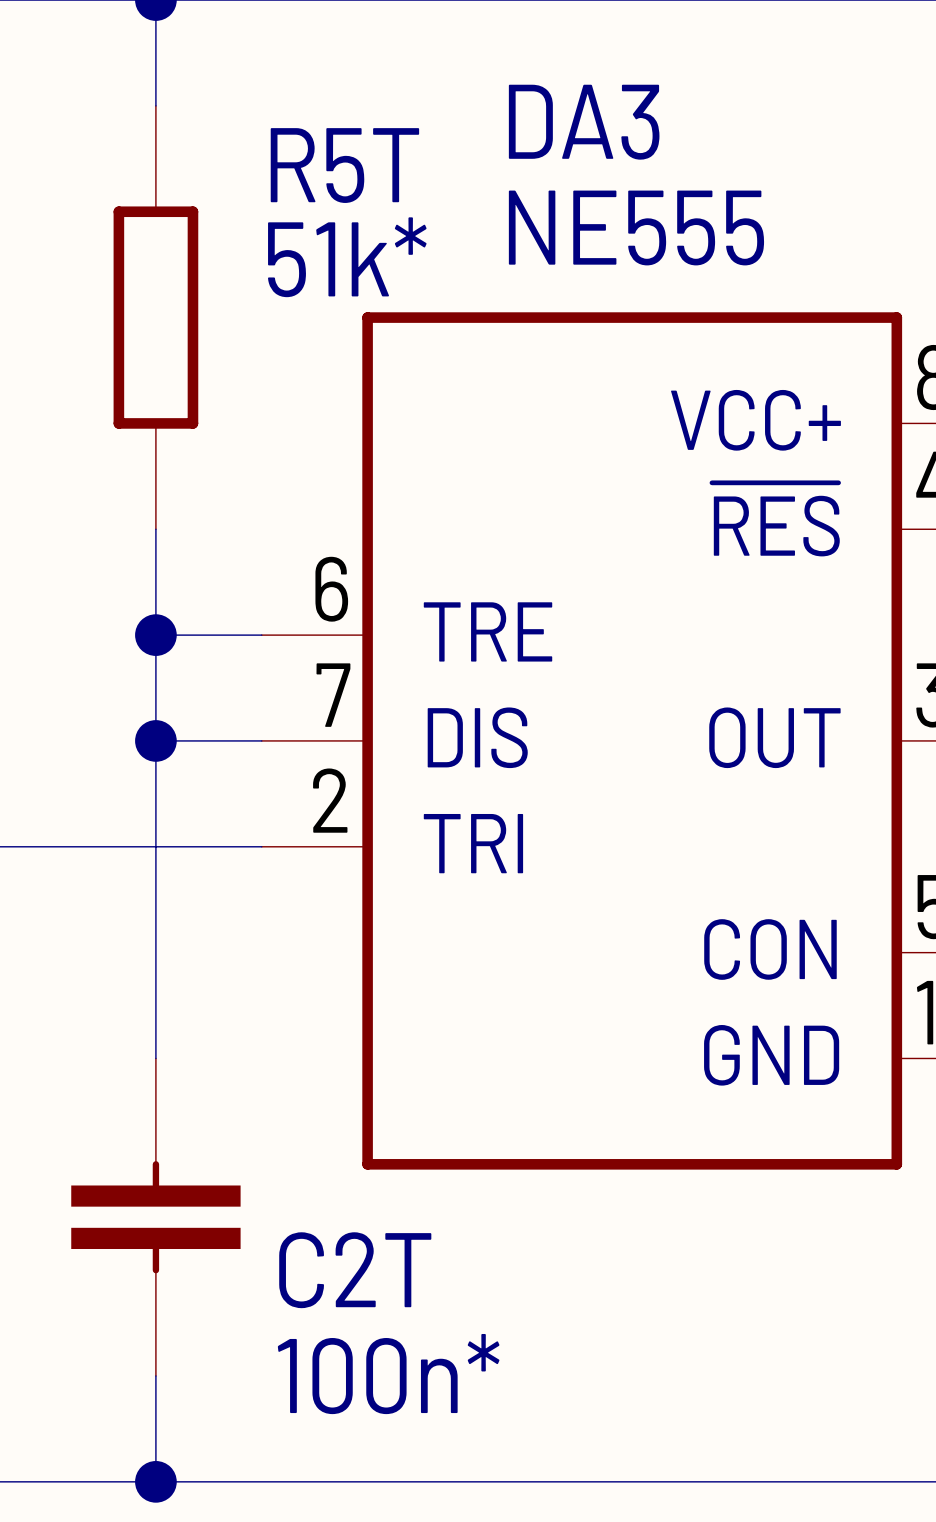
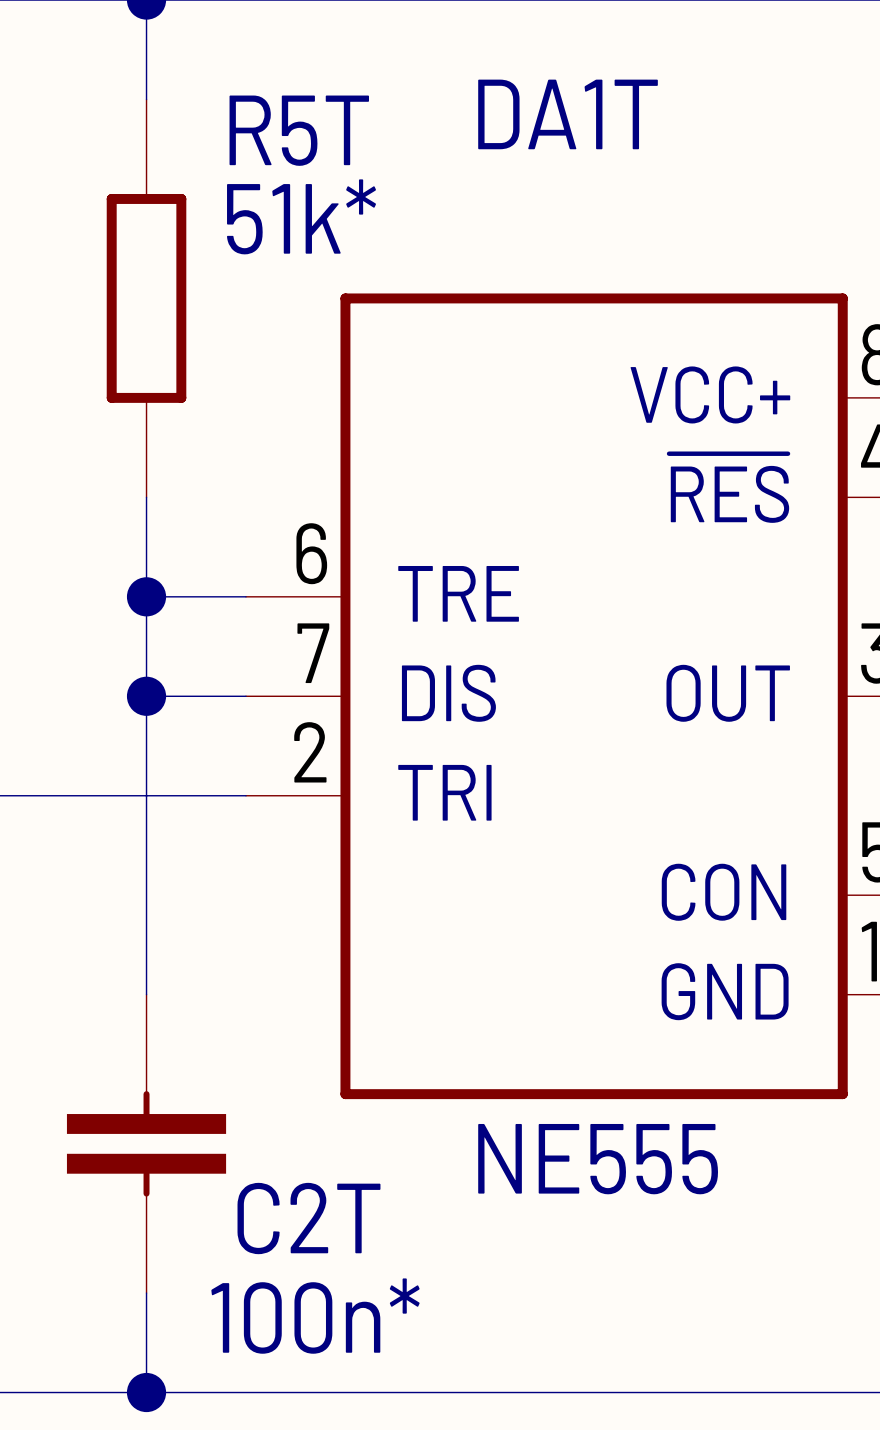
DA3 name: DA3 (584, 122) -> DA1T (568, 114)
R5T name position: R5T (344, 165) -> R5T (299, 130)
DA3 value position: NE555 (636, 227) -> NE555 (598, 1159)
R5T value position: 51k* (347, 257) -> 51k* (301, 216)
C2T name position: C2T (355, 1270) -> C2T (308, 1218)
C2T value position: 100n* (388, 1374) -> 100n* (315, 1316)

